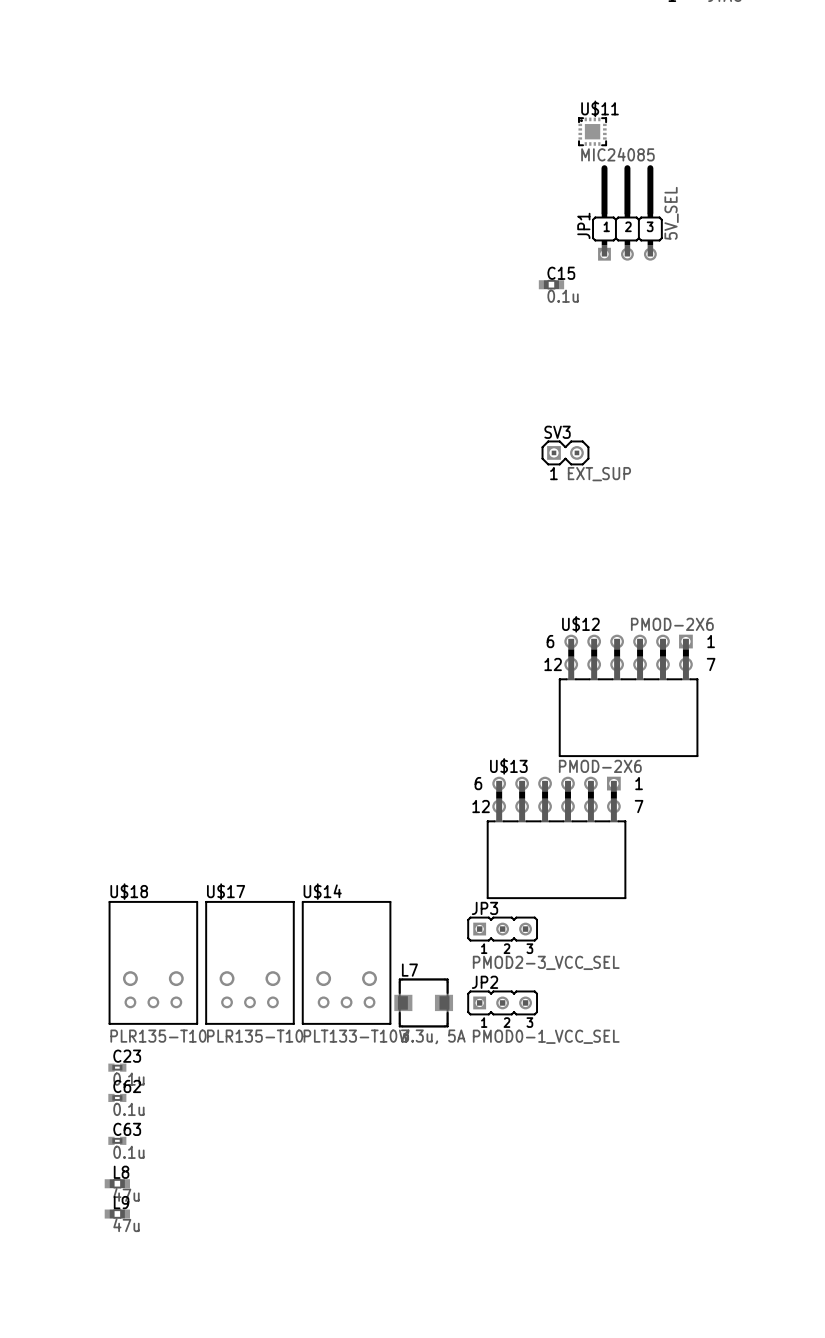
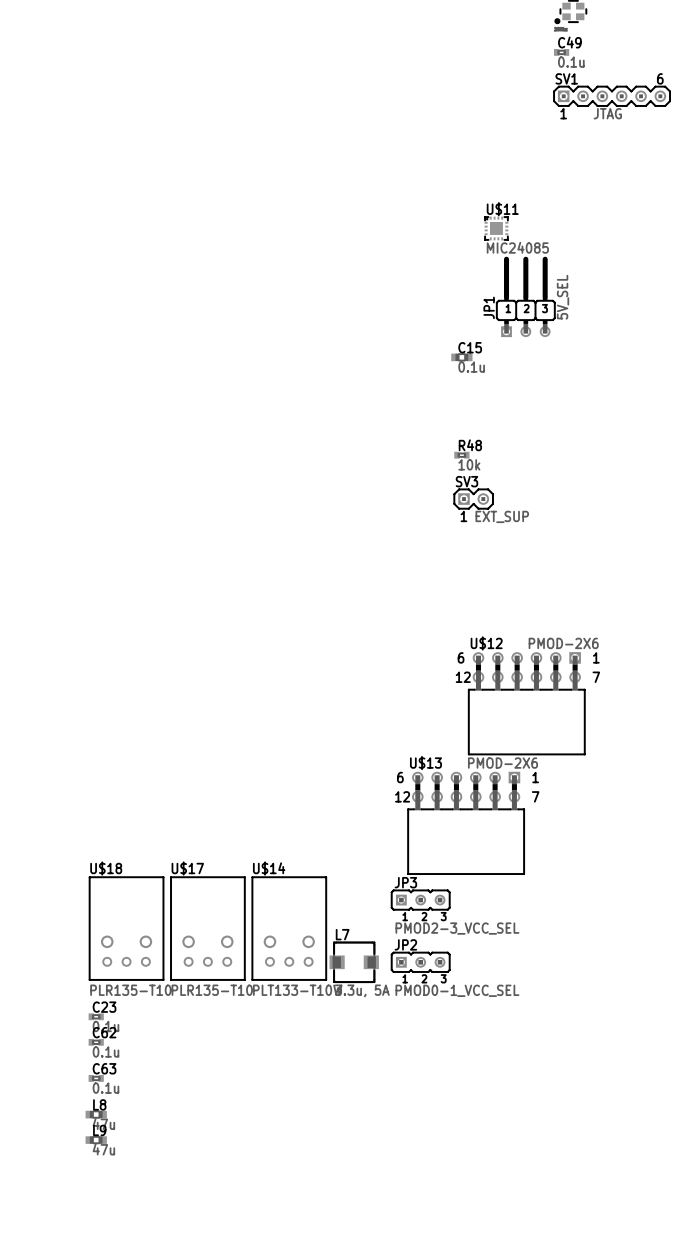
R48: none -> 10k (461, 455)

